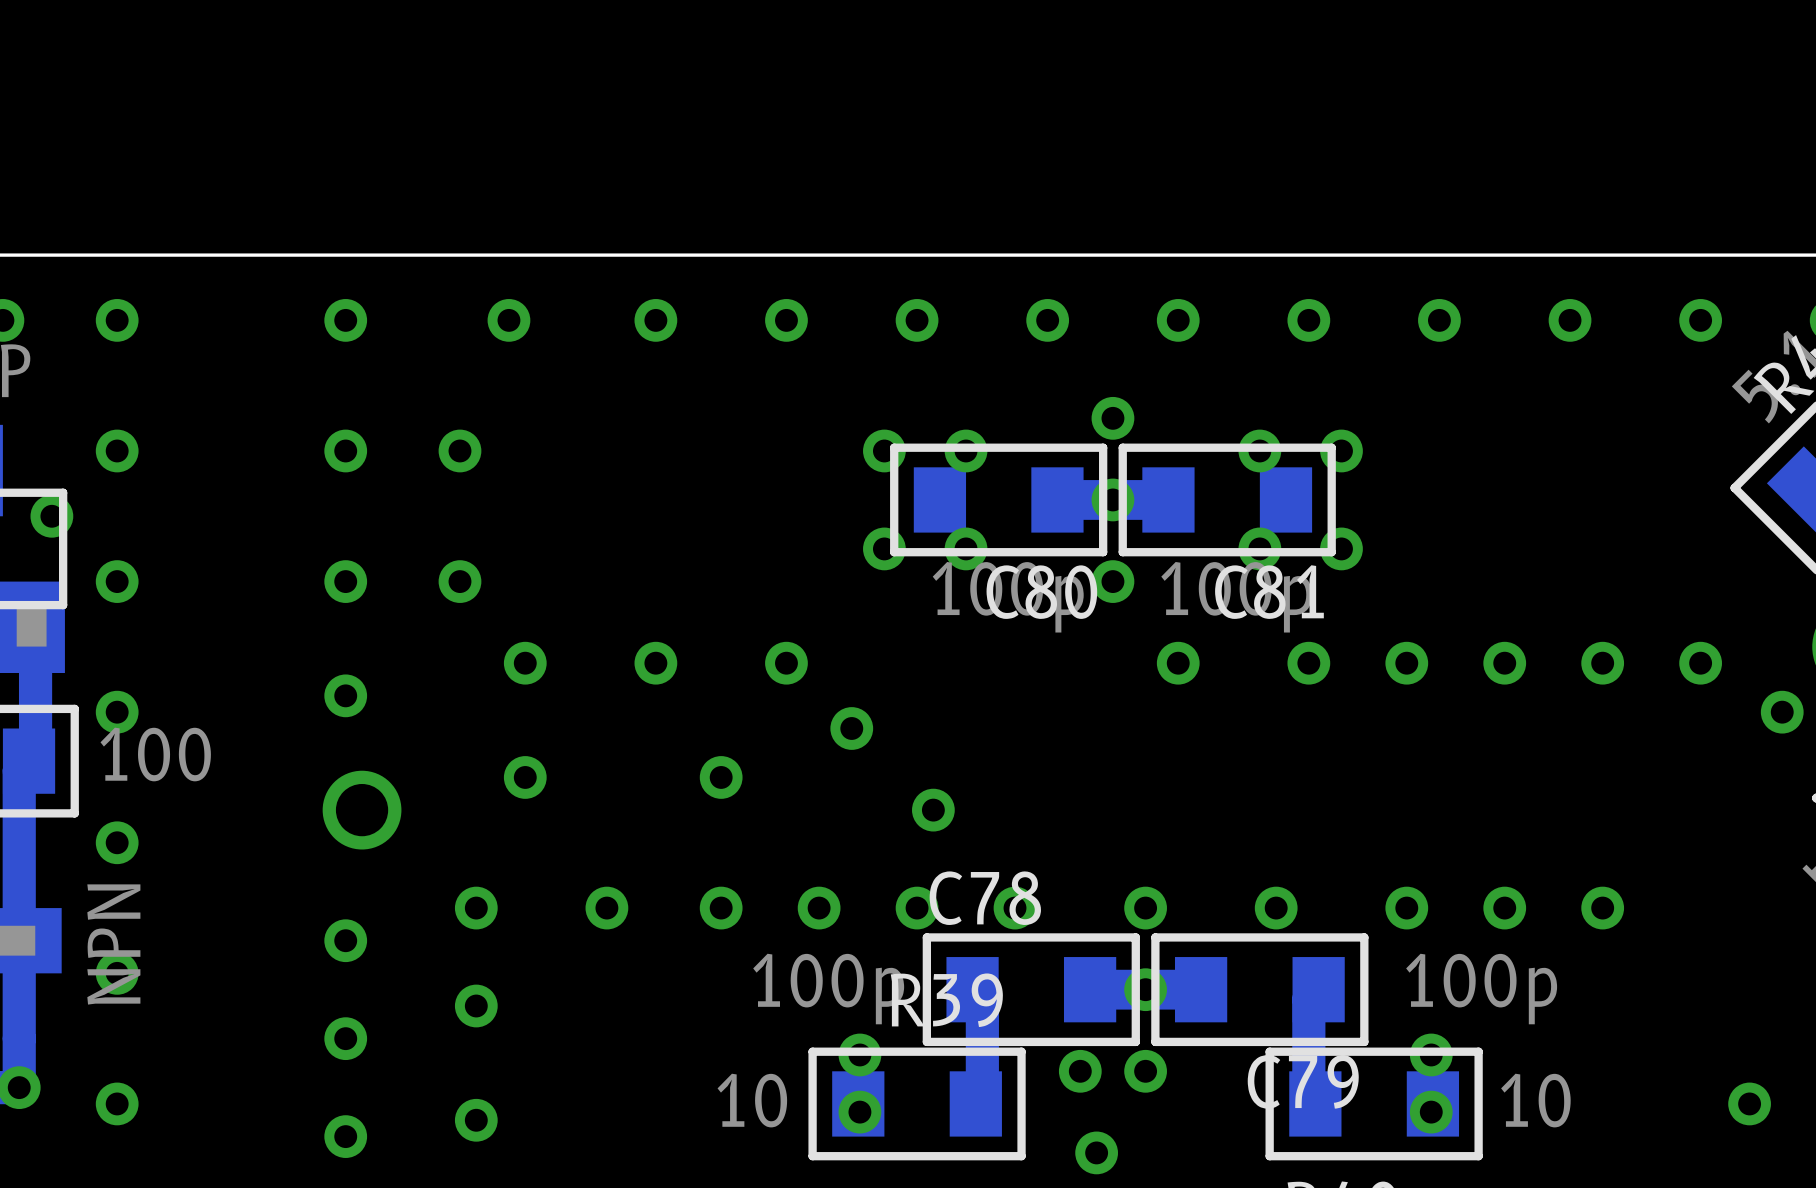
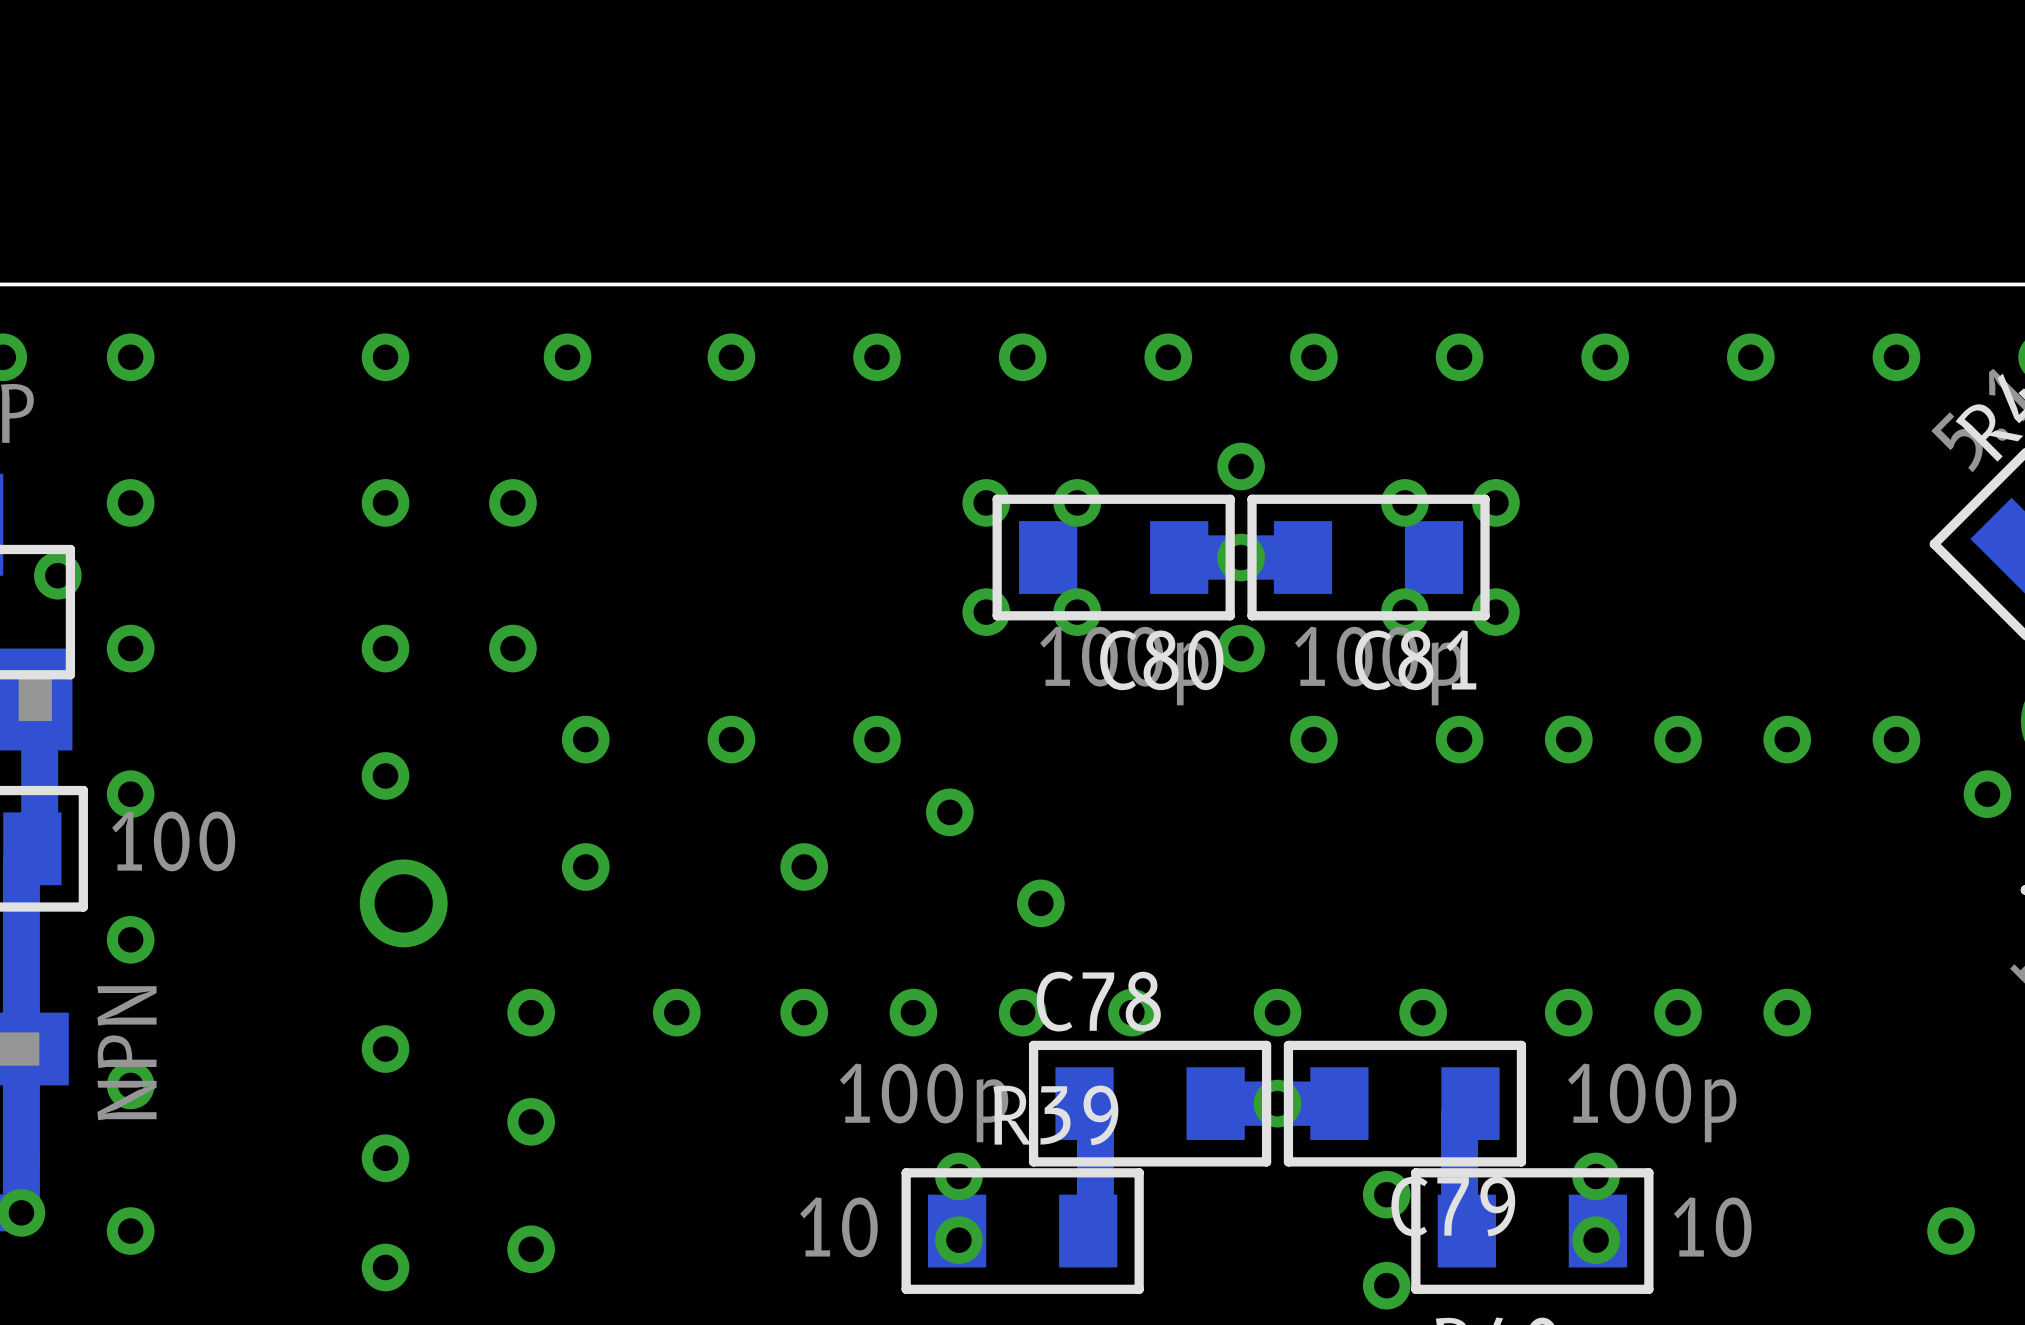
via: (1080, 1071) -> none
via: (1145, 1071) -> none
via: none -> (1386, 1194)
via: (1096, 1152) -> none
via: none -> (1386, 1285)

